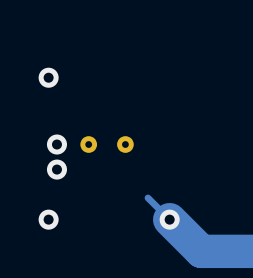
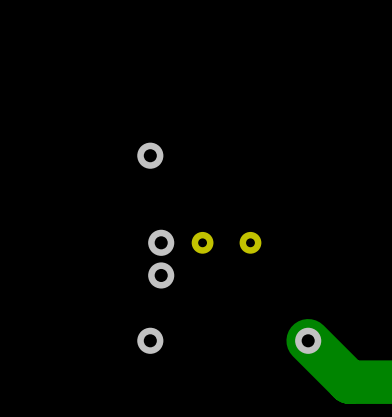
track: (147, 197) (169, 219) -> none

